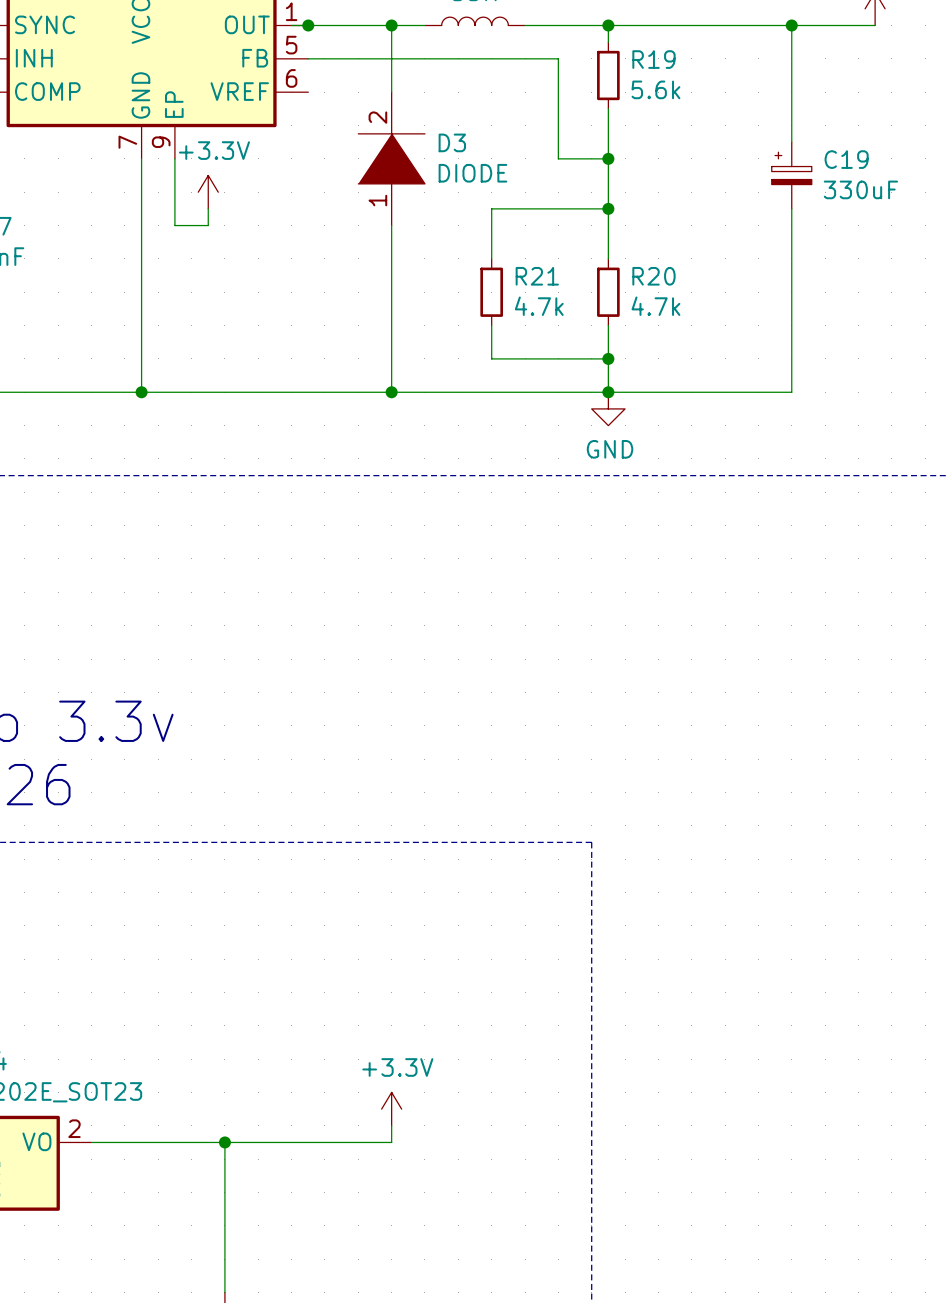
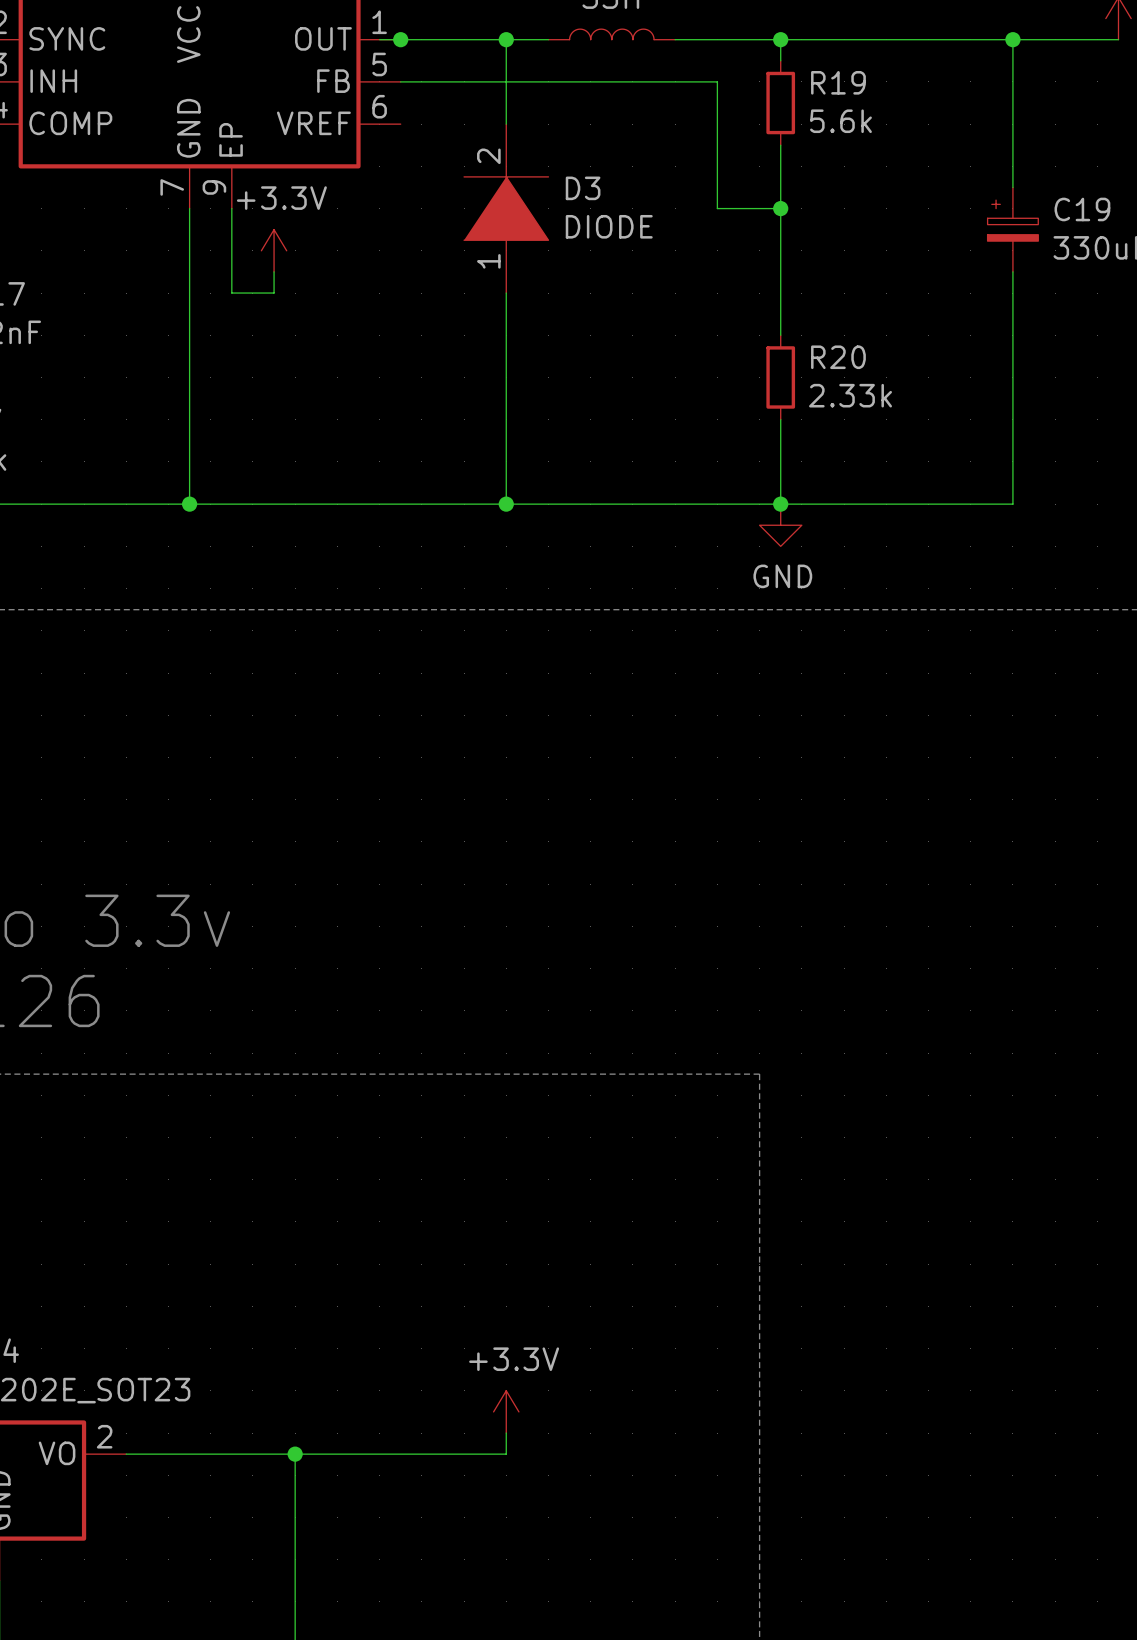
wire: (608, 208) (491, 208) (491, 258) -> none
junction: (608, 208) -> none
R21: 4.7k (491, 292) -> none
R20 value: 4.7k (655, 306) -> 2.33k (850, 395)
wire: (491, 325) (491, 358) (608, 358) -> none
junction: (608, 358) -> none

